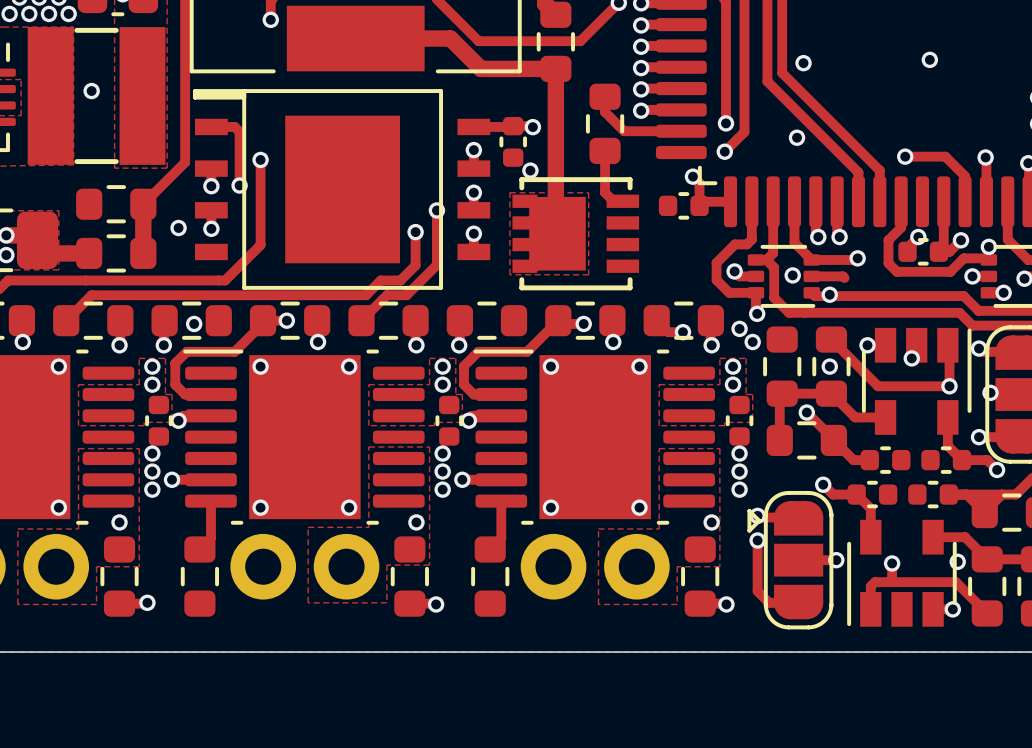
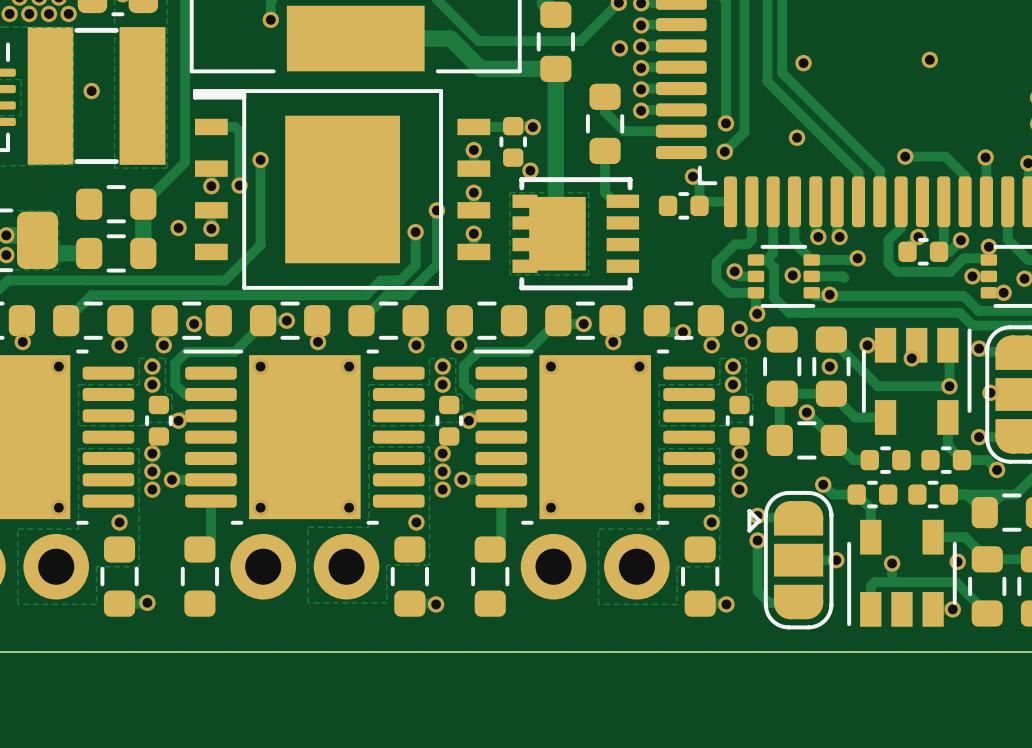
via: none -> (619, 48)

